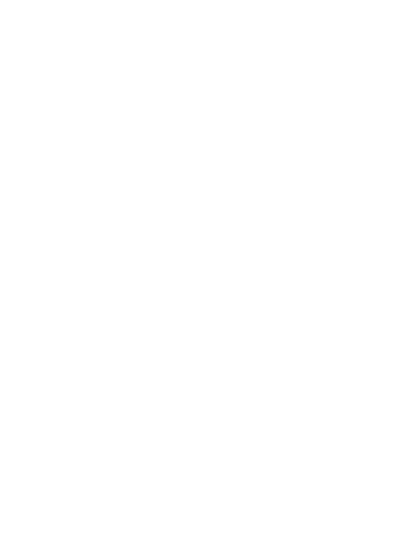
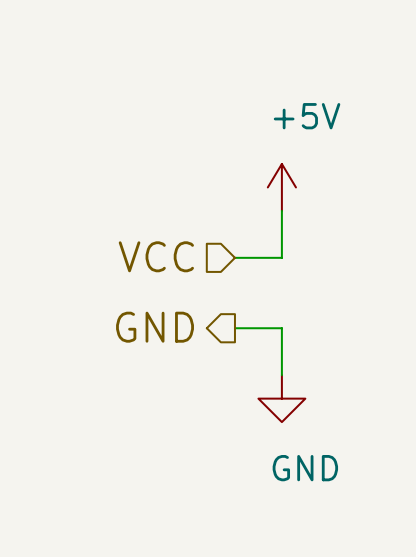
power symbol: none -> +5V (281, 187)
wire: none -> (281, 210) (281, 257) (234, 257)
hierarchical label: none -> VCC (156, 256)
hierarchical label: none -> GND (155, 327)
wire: none -> (234, 328) (281, 328) (281, 375)
power symbol: none -> GND (281, 398)

